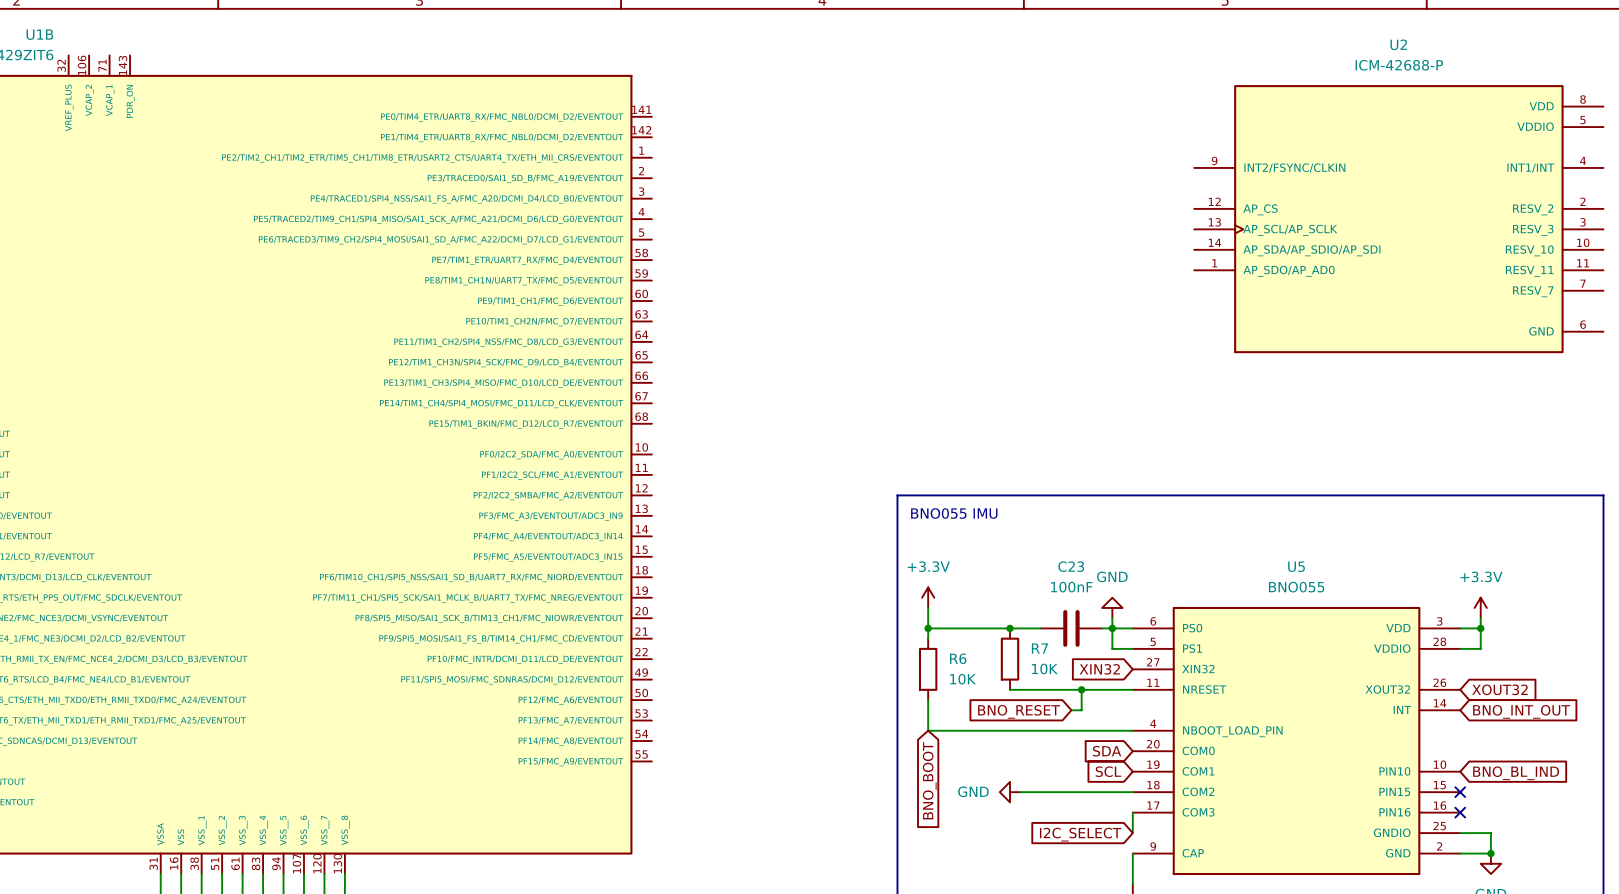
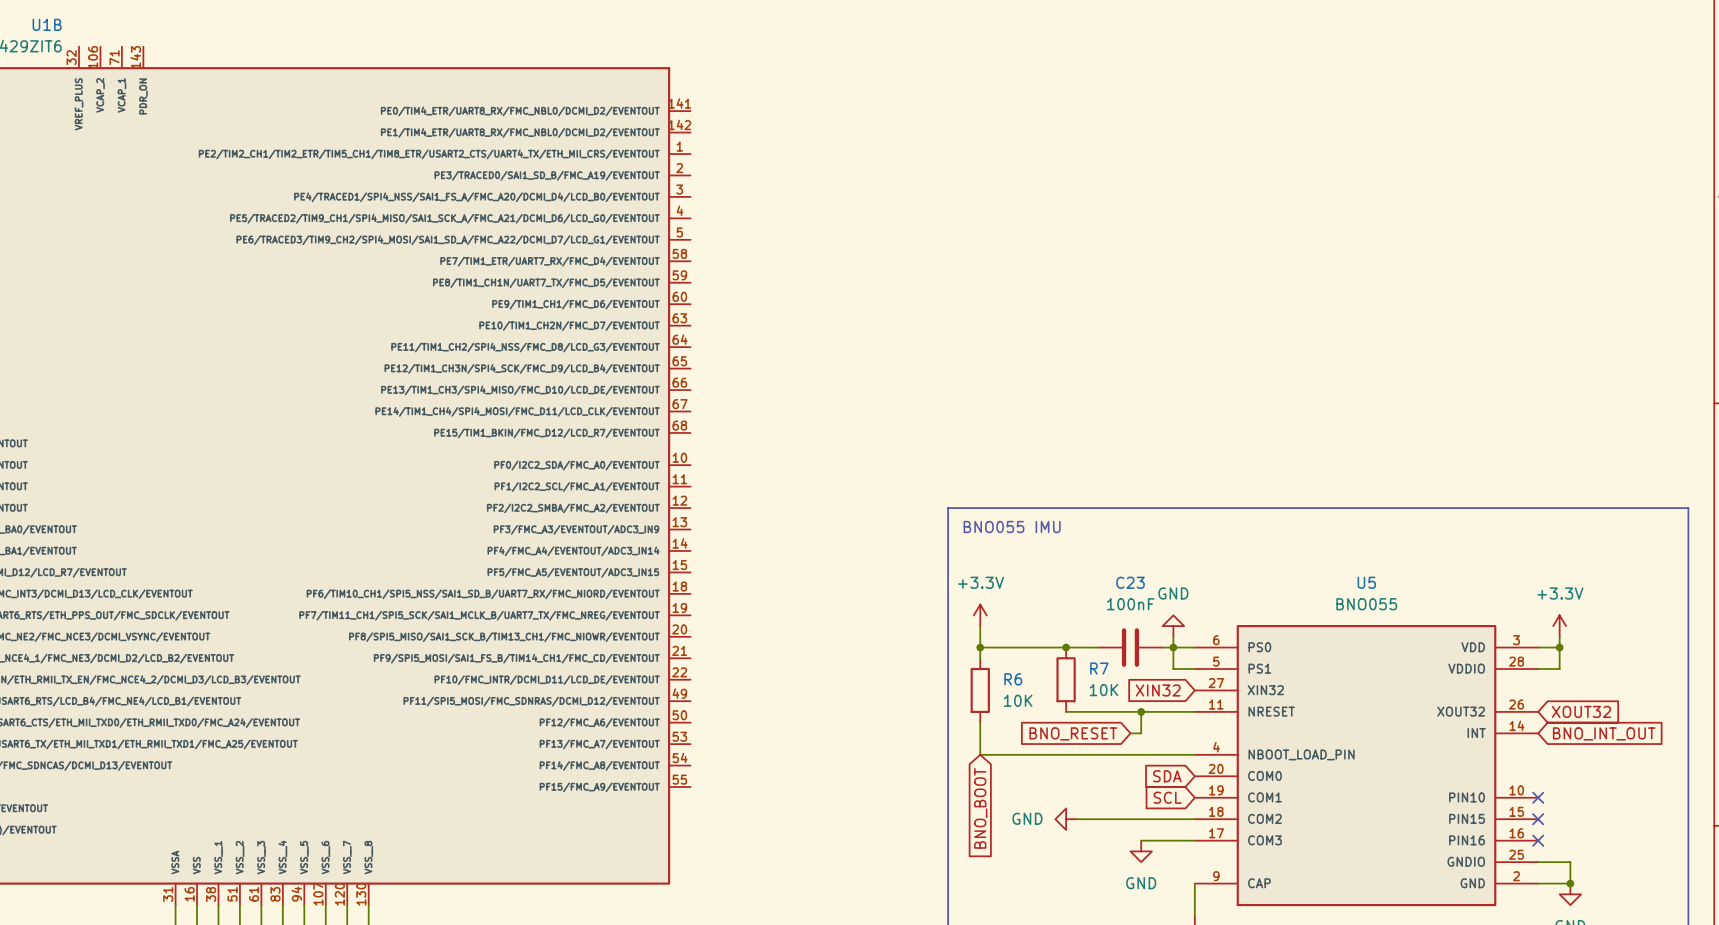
U2: ICM-42688-P (1398, 219) -> none
no-connect mark: none -> (1538, 797)
global label: BNO_BL_IND (1516, 773) -> none
wire: (1132, 812) (1132, 833) -> (1194, 840) (1141, 840)
power symbol: none -> GND (1141, 851)
global label: I2C_SELECT (1080, 834) -> none

